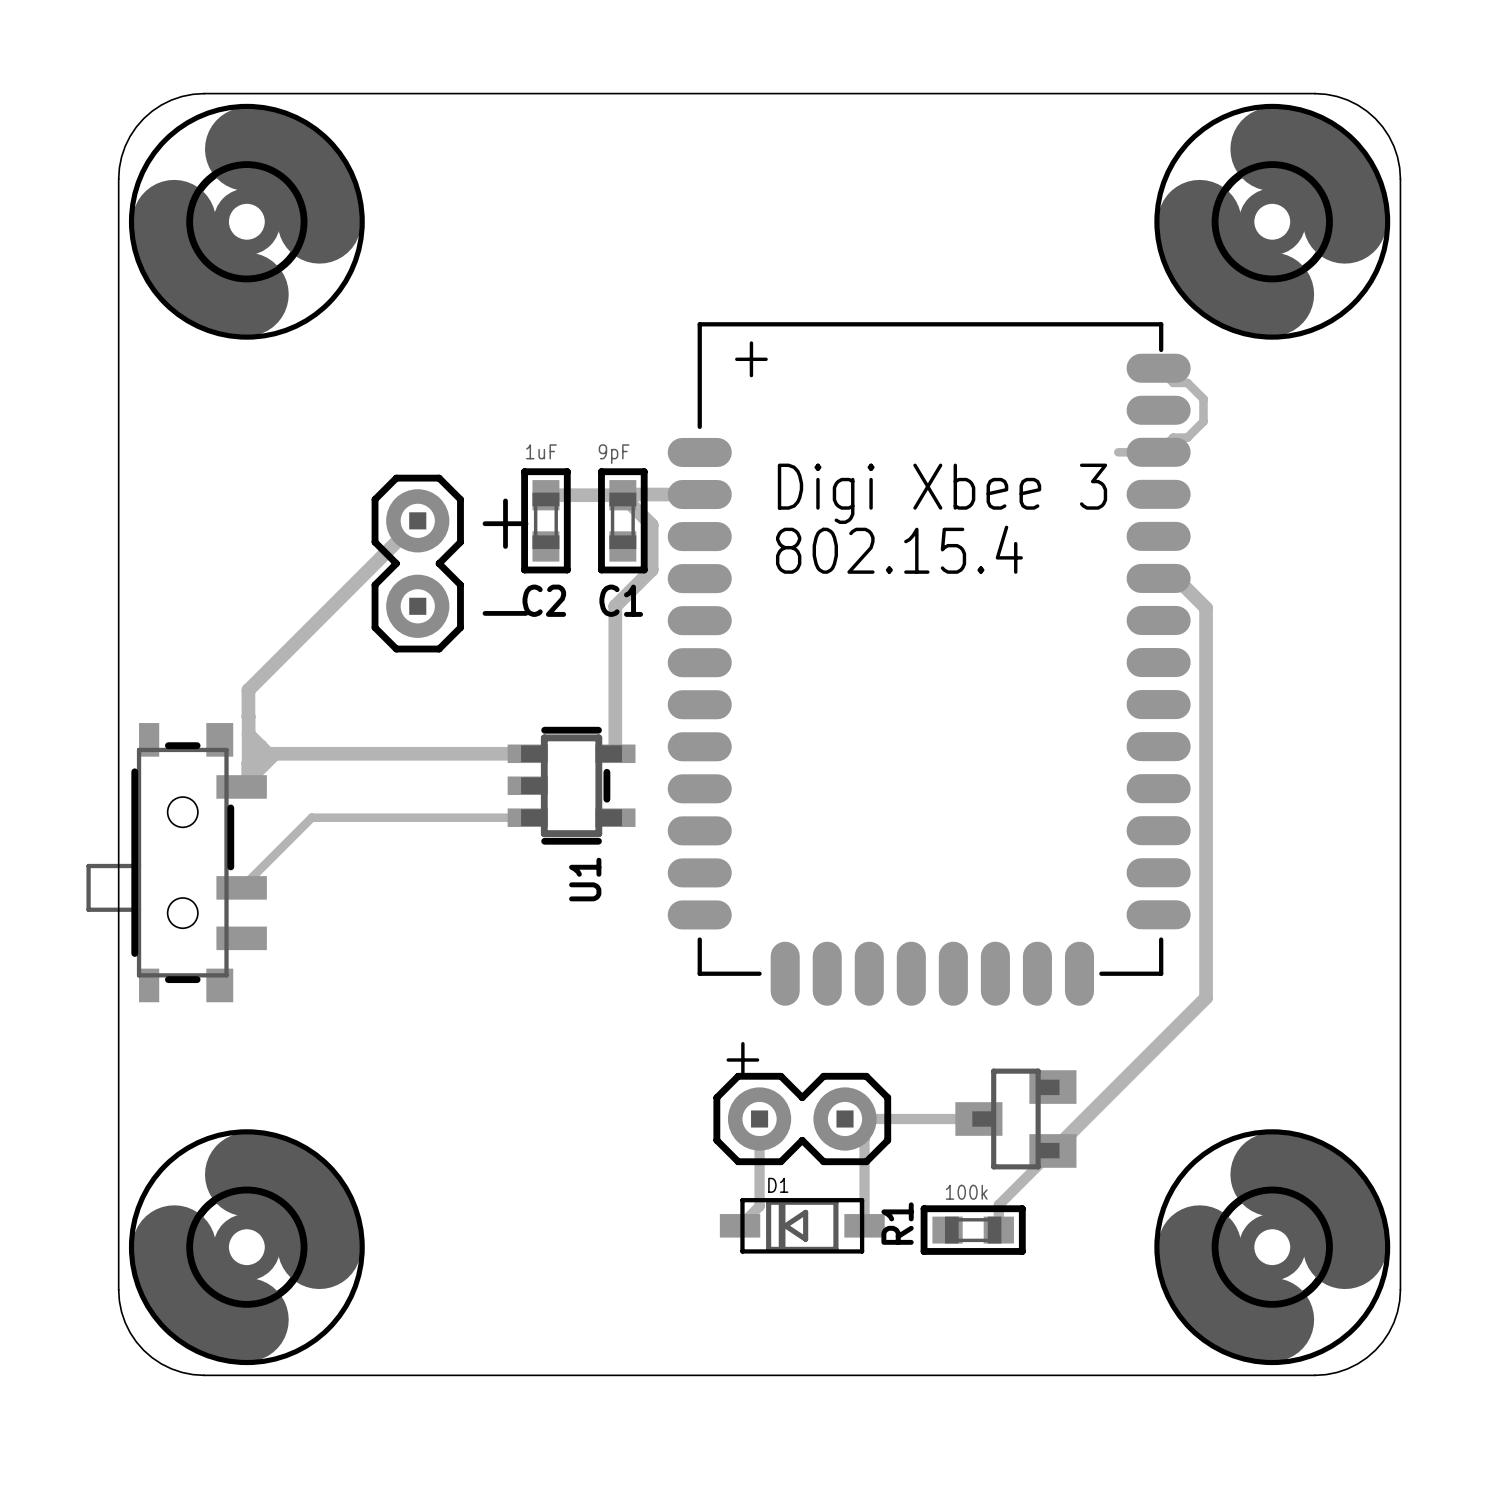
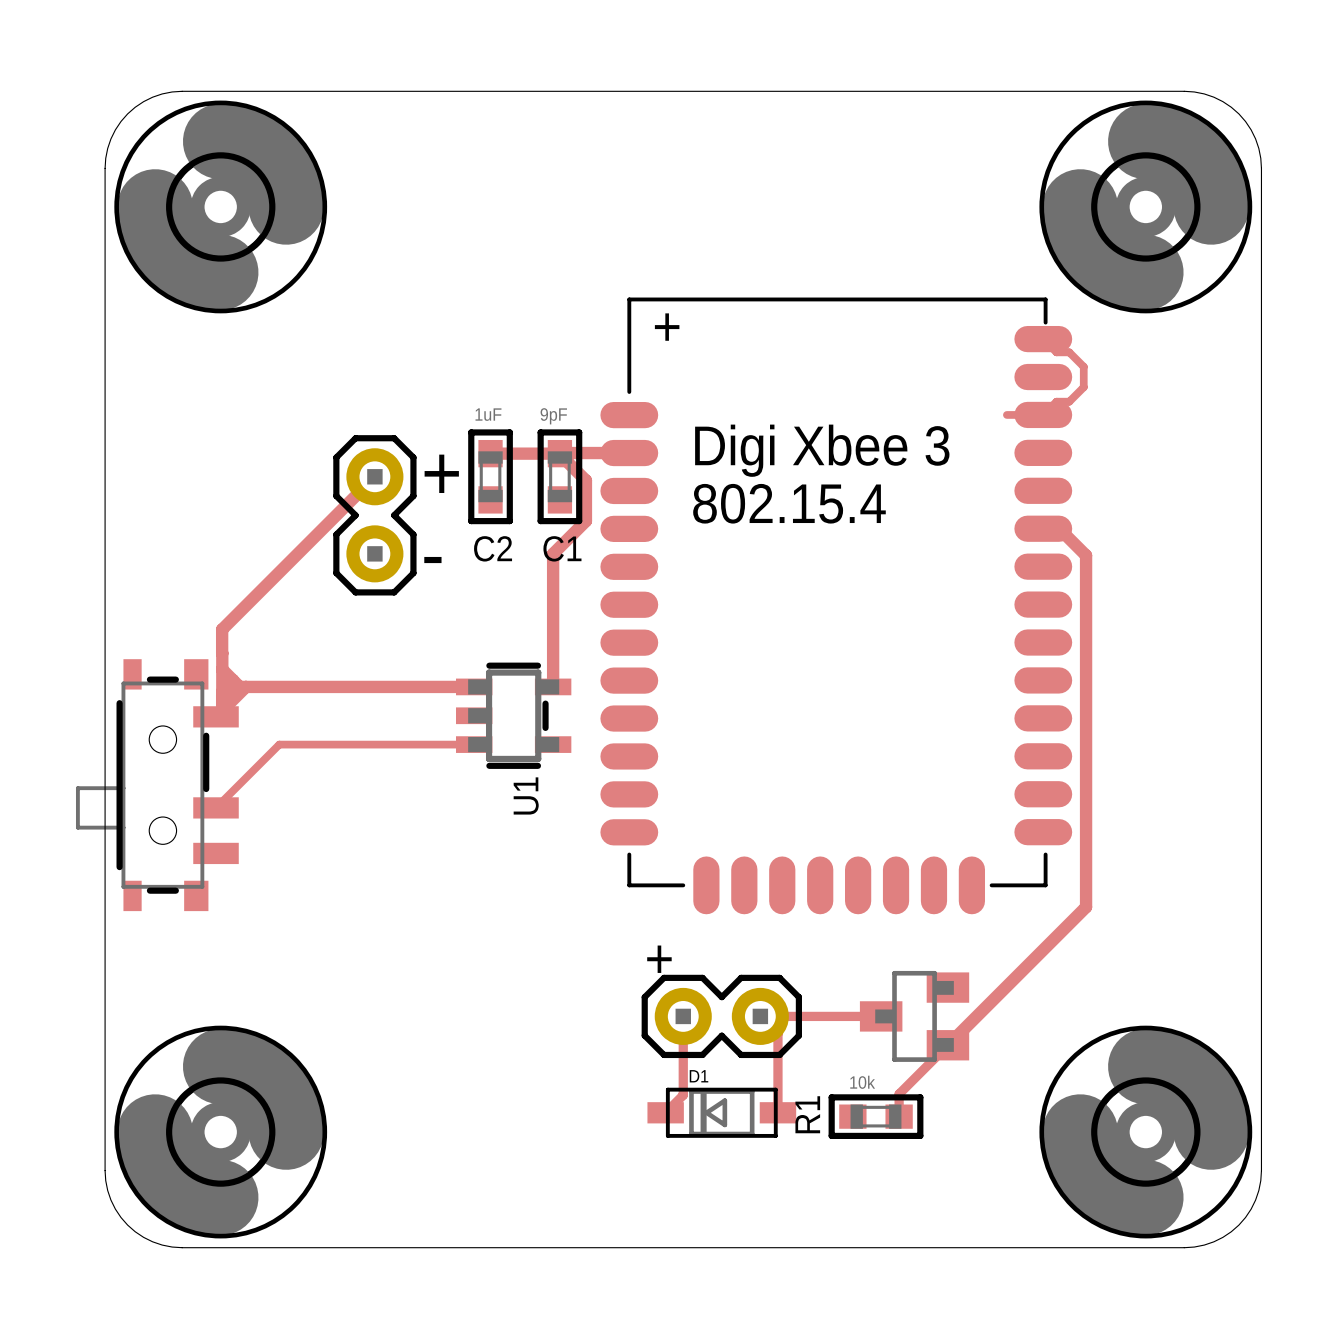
R1 value: 100k (966, 1192) -> 10k (862, 1082)

